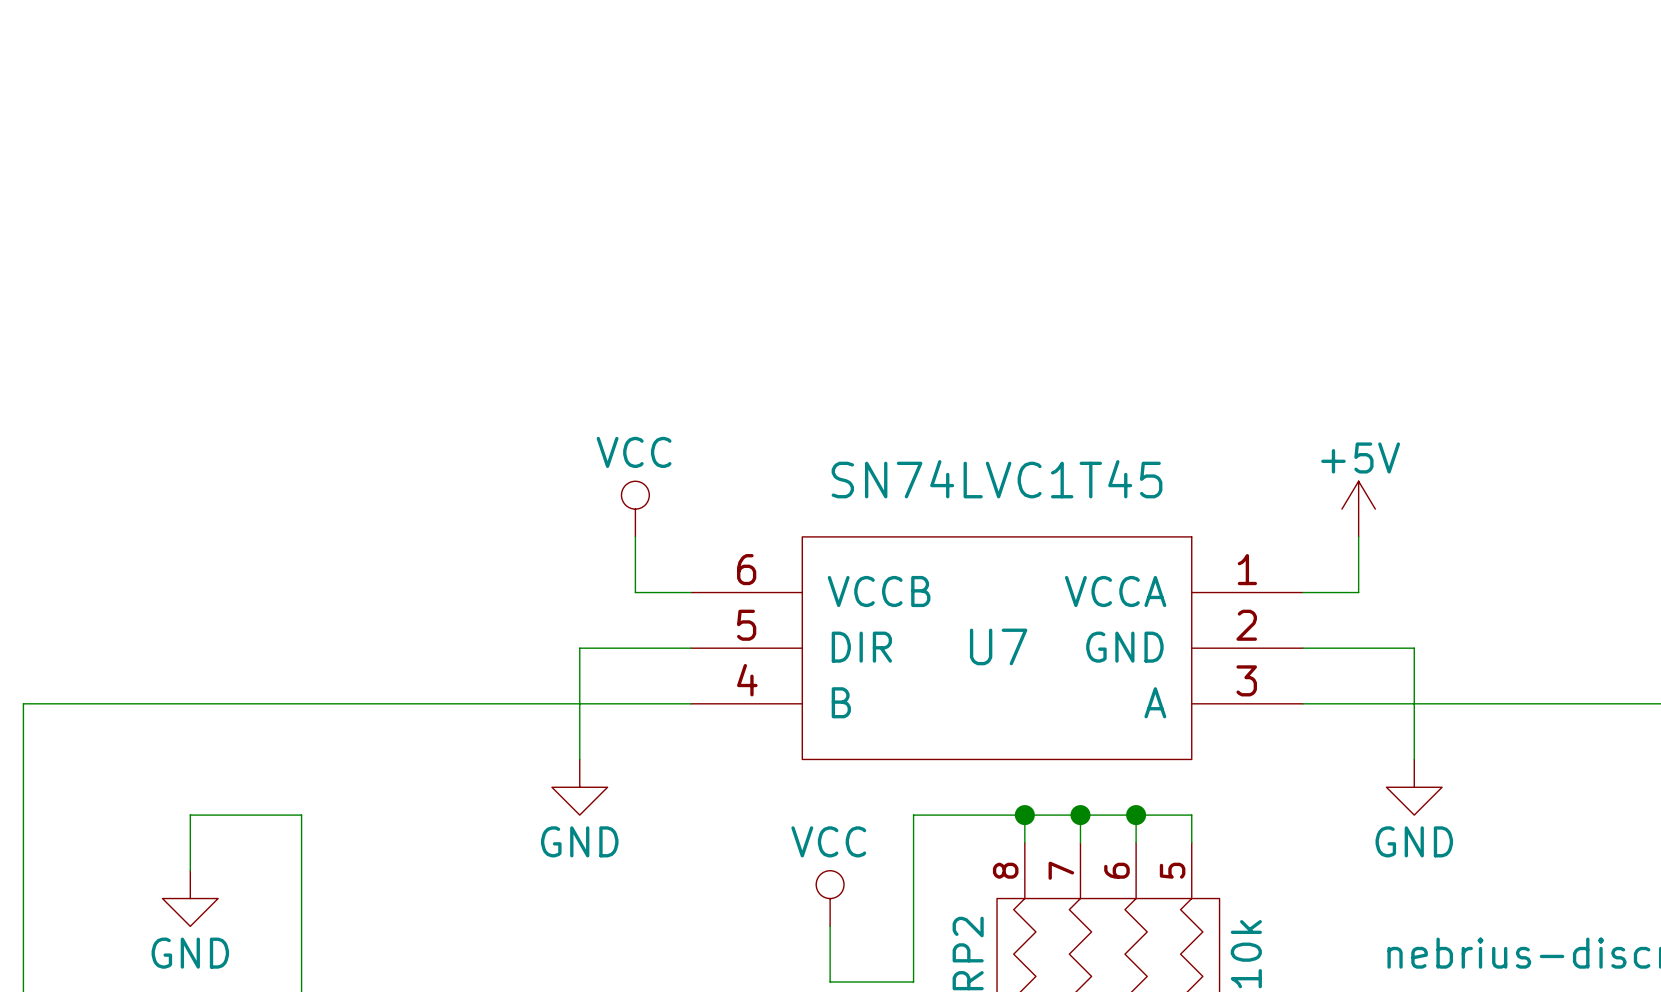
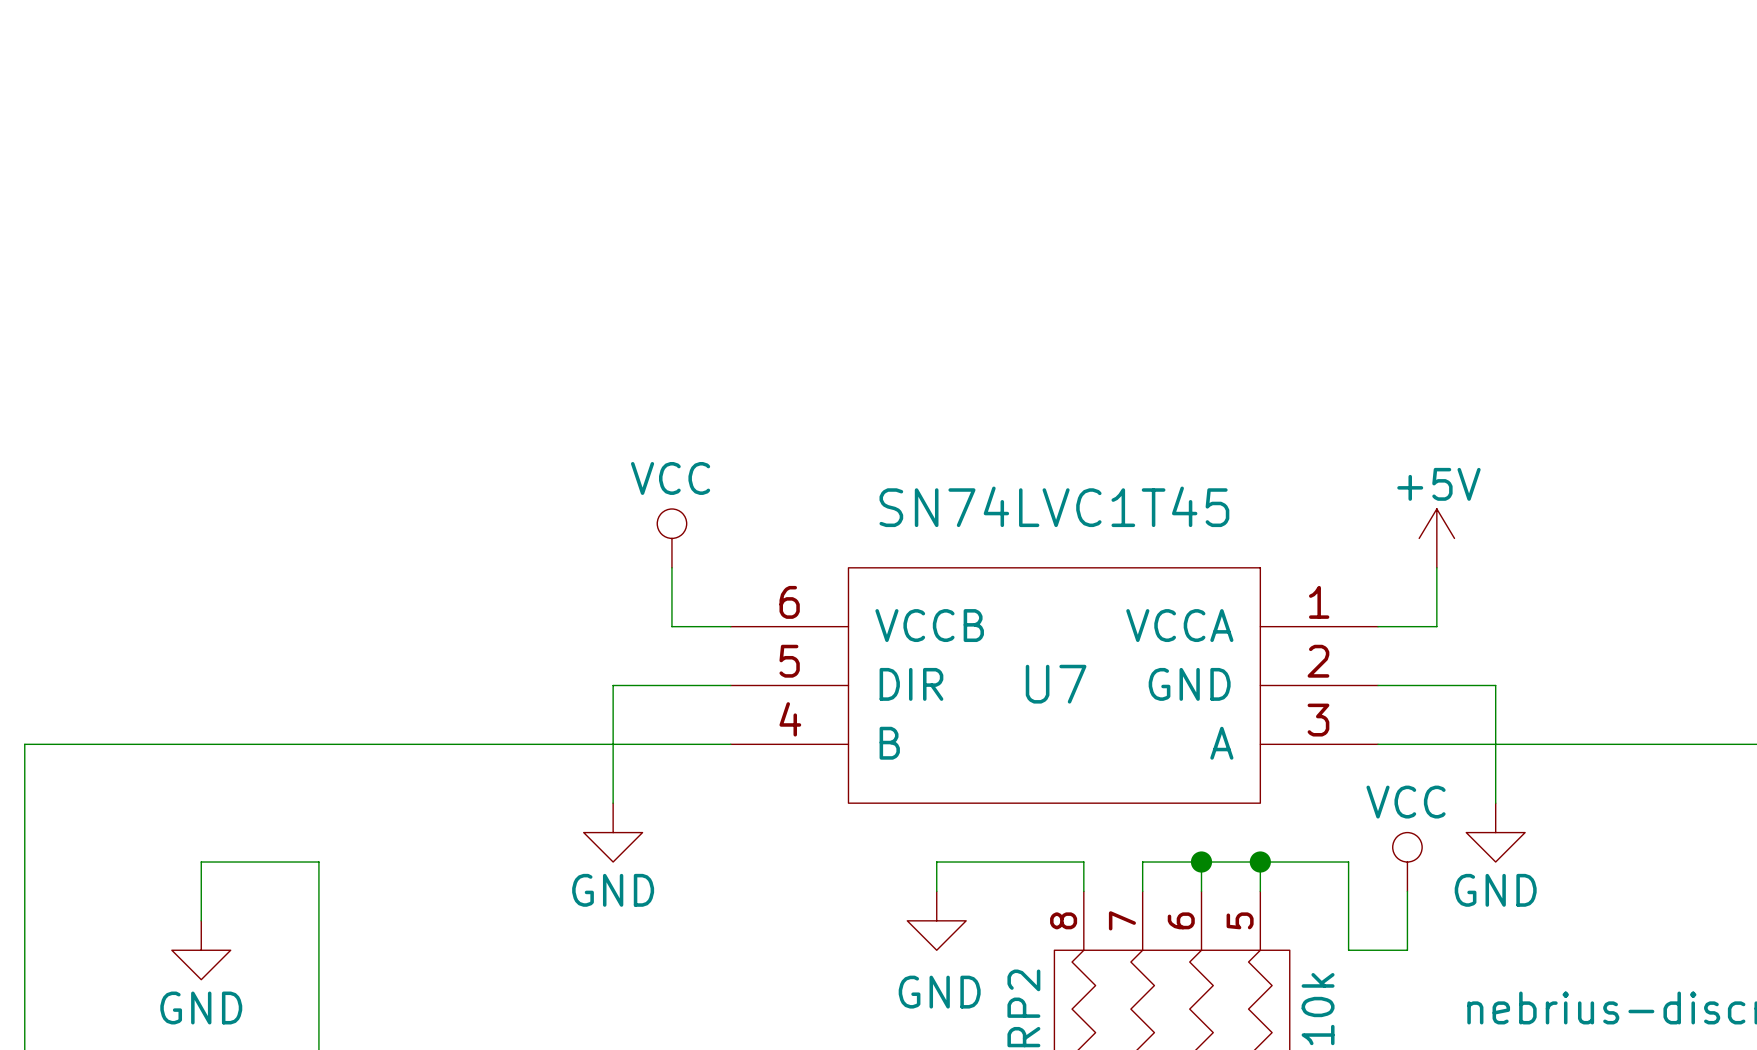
wire: (913, 815) (913, 981) (830, 981) (830, 926) -> (966, 862) (936, 862) (936, 891)
wire: (1024, 815) (1080, 815) -> none
junction: (1024, 815) -> none
junction: (1080, 815) -> none
wire: none -> (1260, 862) (1348, 862) (1348, 950) (1407, 950) (1407, 891)
junction: none -> (1260, 862)
power symbol: none -> GND (936, 920)
power symbol position: VCC (830, 898) -> VCC (1407, 862)

